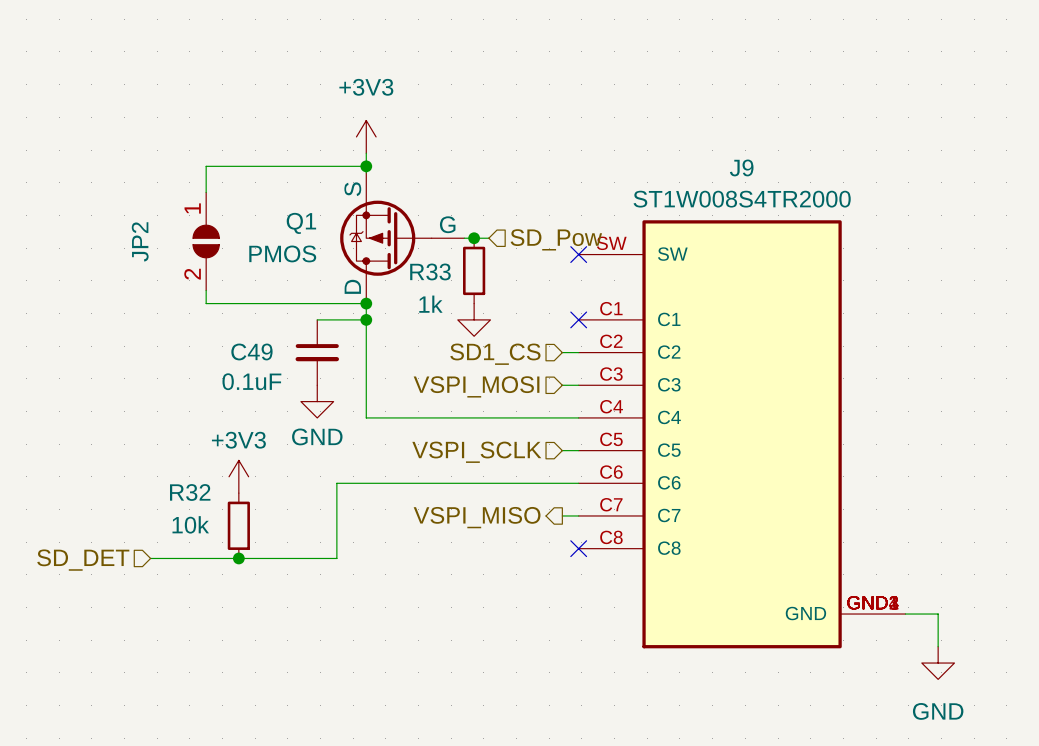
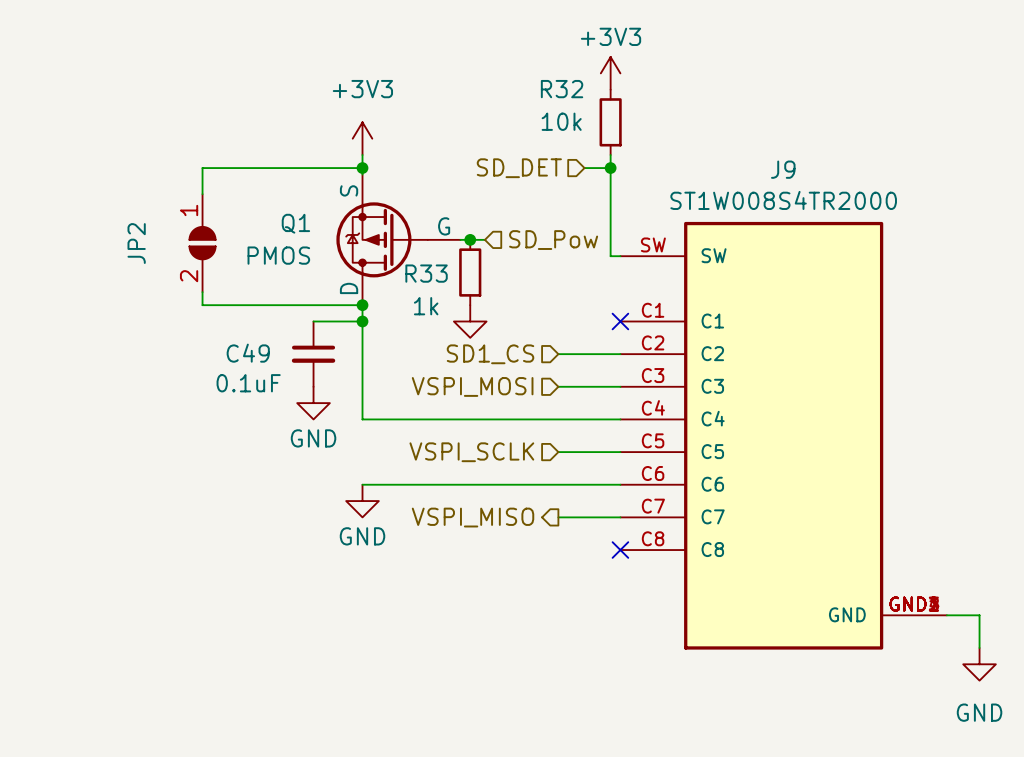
power symbol: none -> +3V3 (610, 73)
wire: none -> (610, 154) (610, 256) (620, 256)
wire: none -> (584, 168) (610, 168)
junction: none -> (610, 168)
hierarchical label: none -> SD_DET (519, 168)
no-connect mark: (578, 254) -> none
no-connect mark: (578, 319) -> none
no-connect mark: none -> (620, 321)
J9 position: (742, 434) -> (783, 435)
power symbol: +3V3 (238, 476) -> none
wire: (366, 483) (336, 483) (336, 558) (150, 558) -> none
power symbol: none -> GND (362, 501)
R32 position: (238, 525) -> (610, 122)
no-connect mark position: (578, 548) -> (620, 550)
junction: (238, 558) -> none
hierarchical label: SD_DET (83, 560) -> none
wire: (905, 614) (938, 614) (938, 646) -> (946, 615) (979, 615) (979, 647)
power symbol position: GND (938, 663) -> GND (979, 664)

